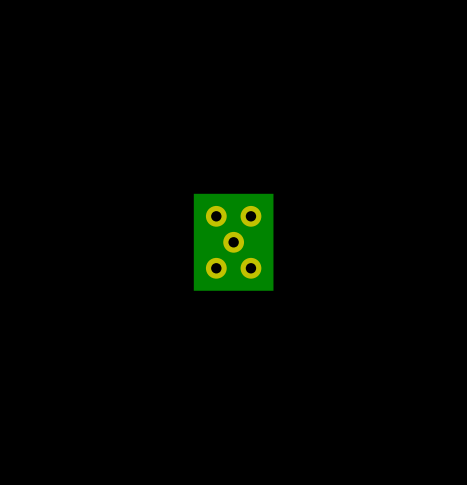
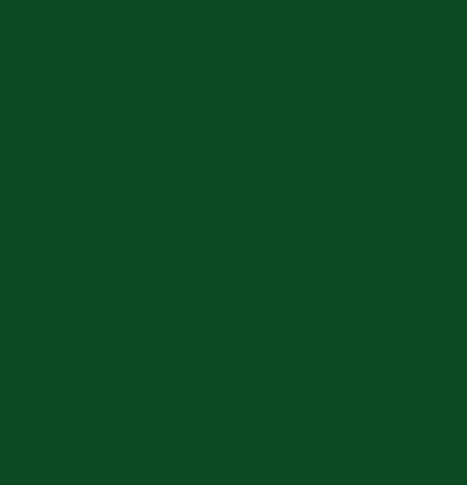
part: (233, 242) -> none

